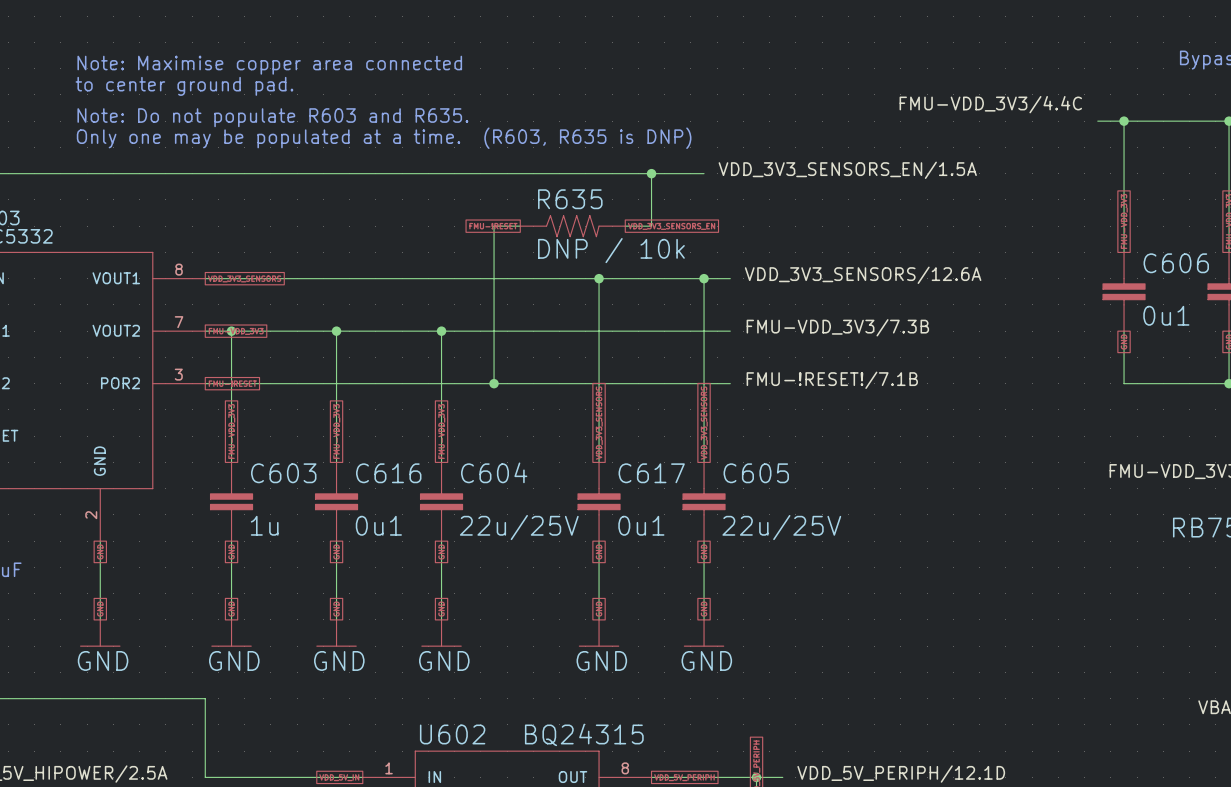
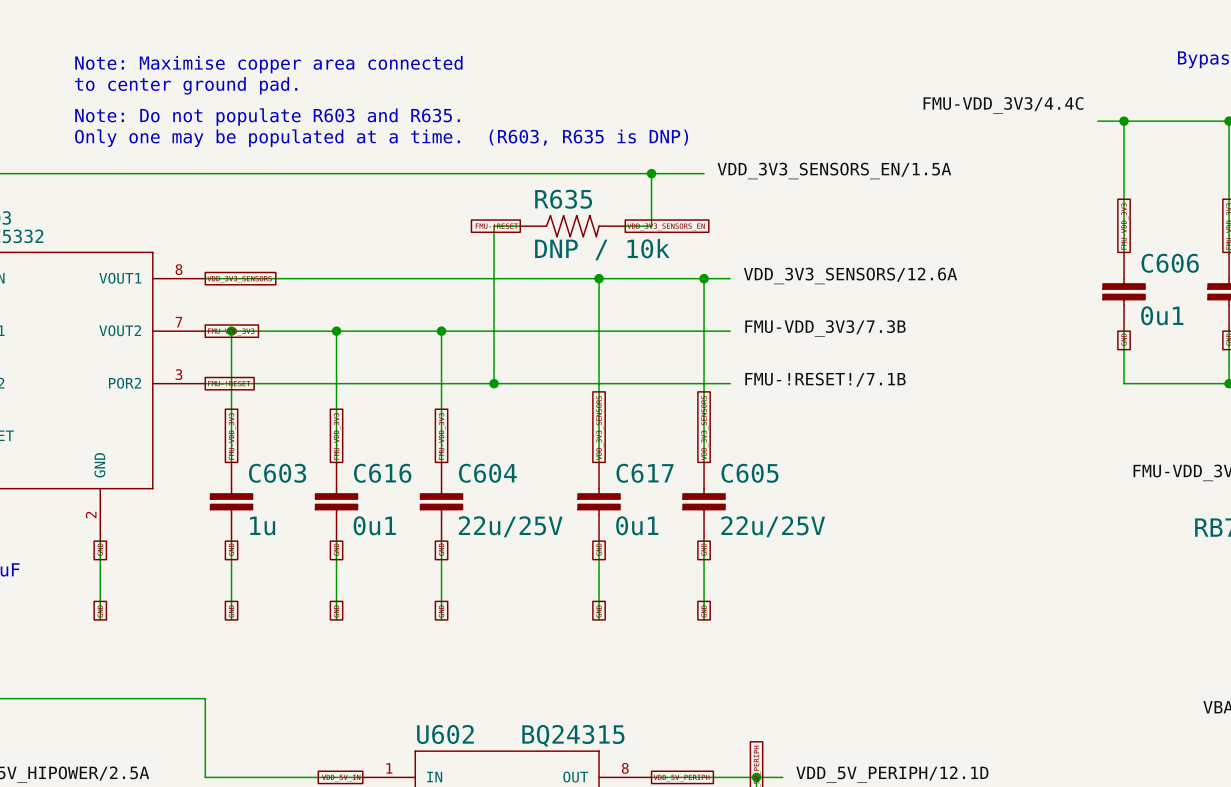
power symbol: GND (100, 633) -> none
power symbol: GND (231, 633) -> none
power symbol: GND (336, 633) -> none
power symbol: GND (441, 633) -> none
power symbol: GND (599, 633) -> none
power symbol: GND (704, 633) -> none

